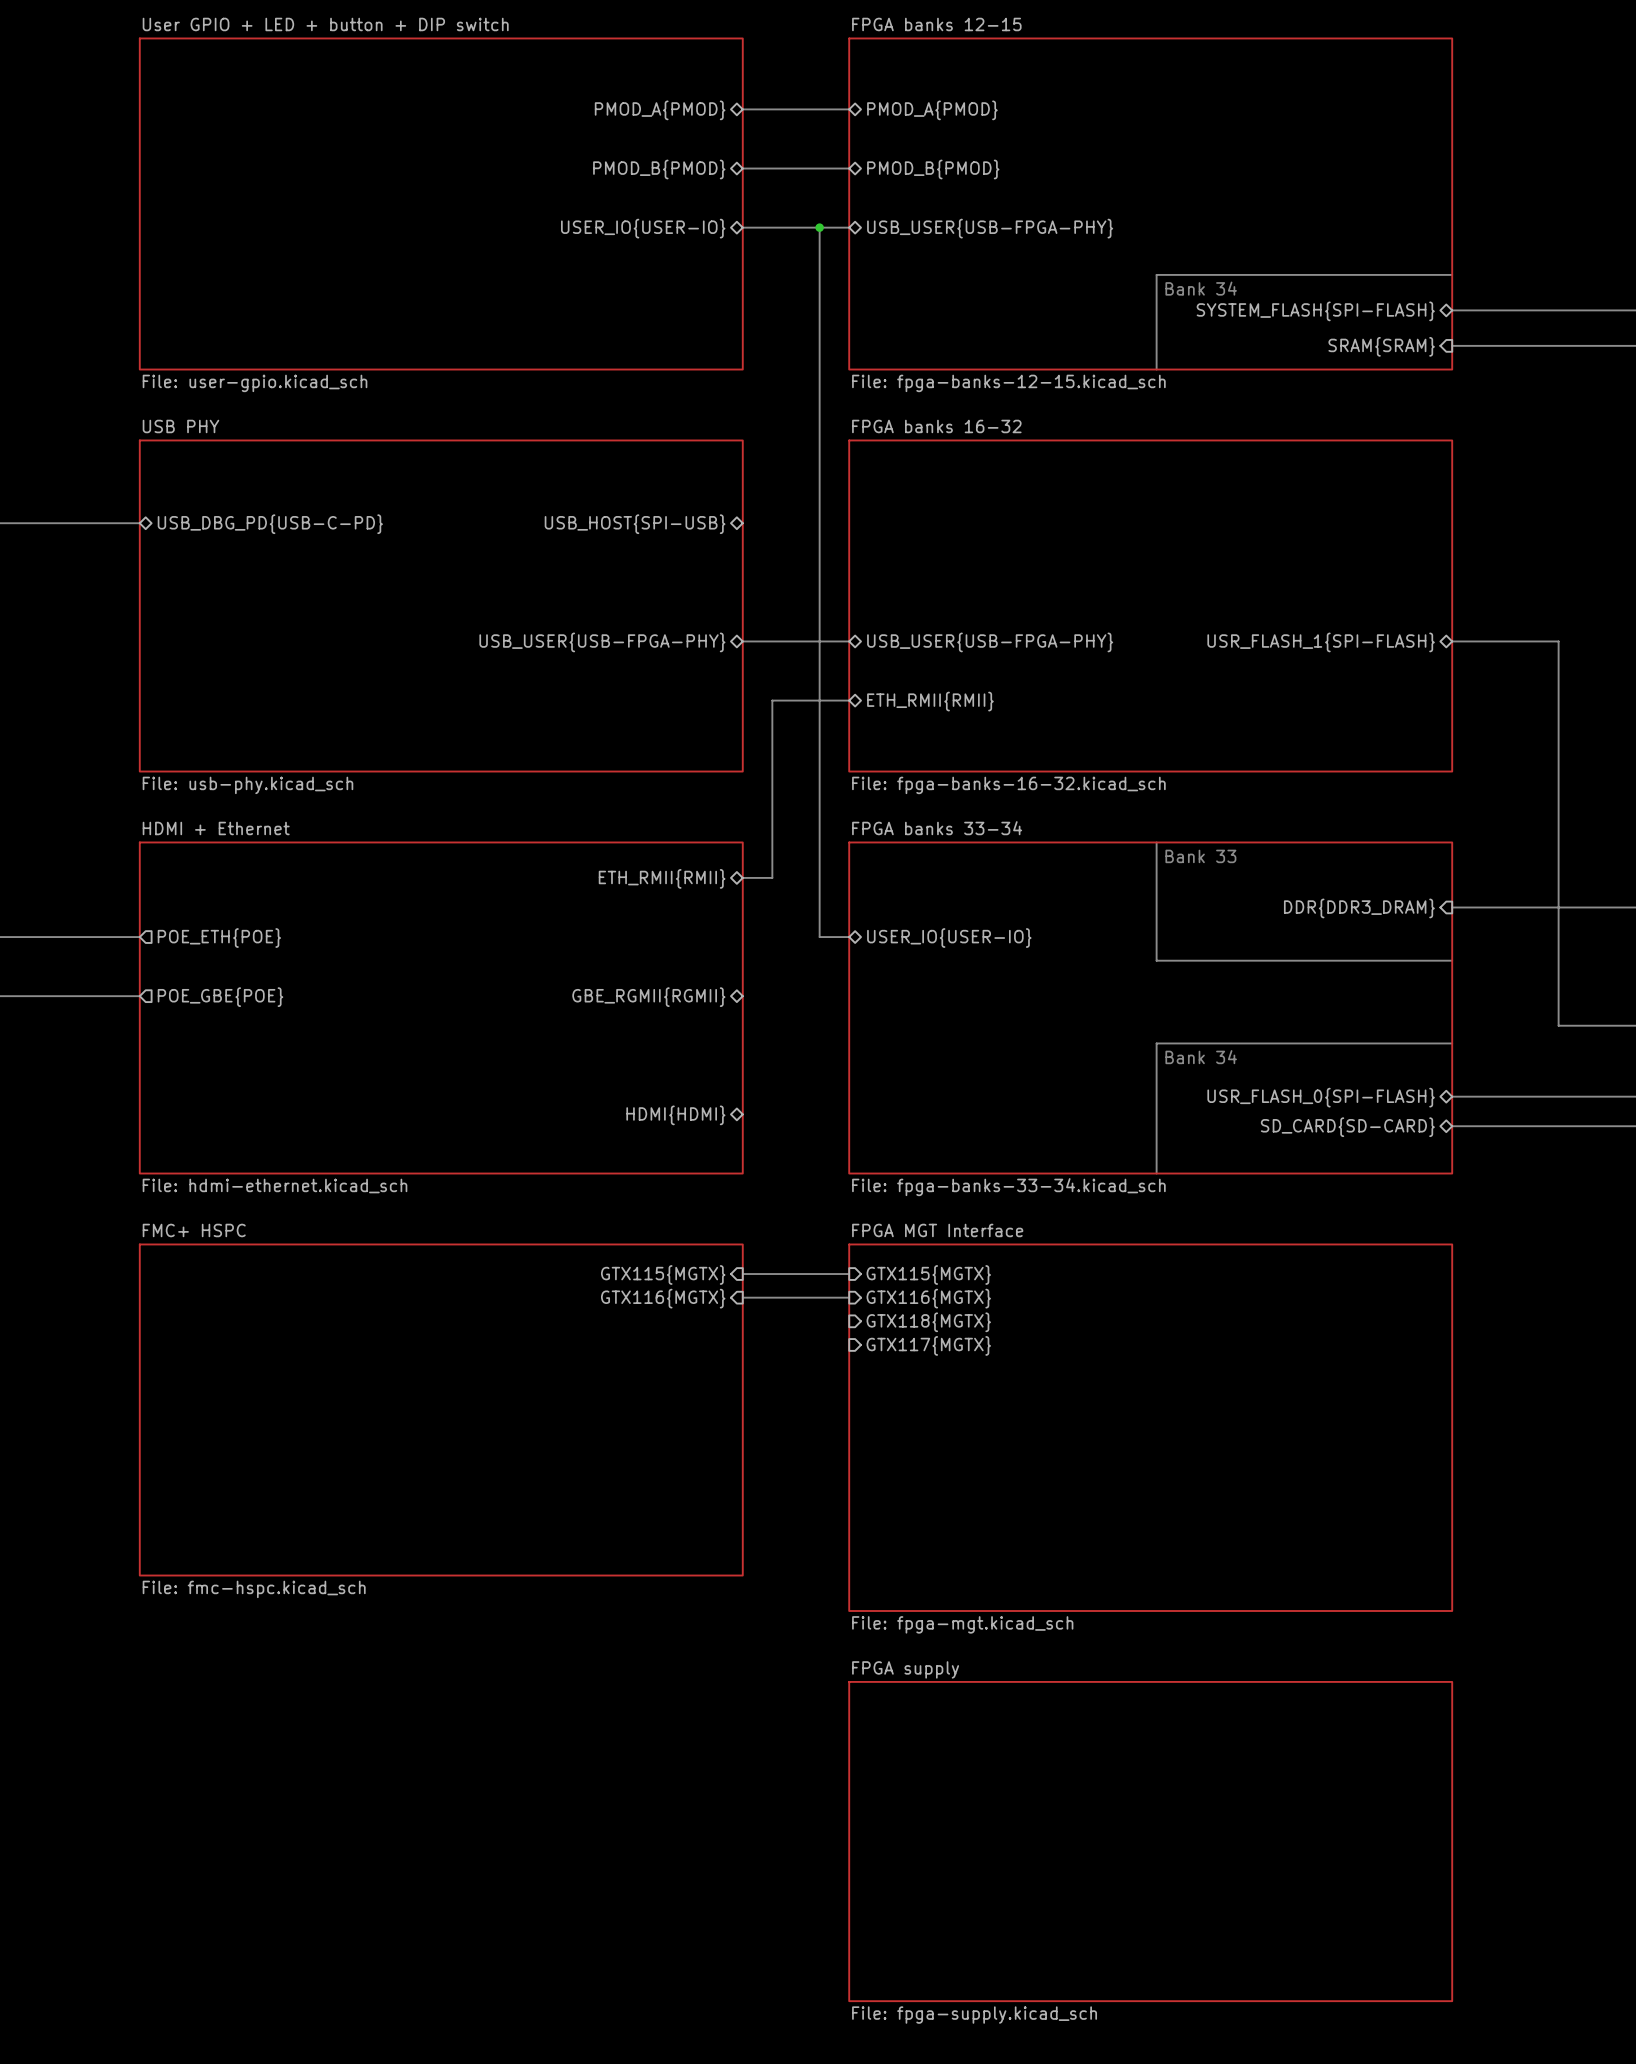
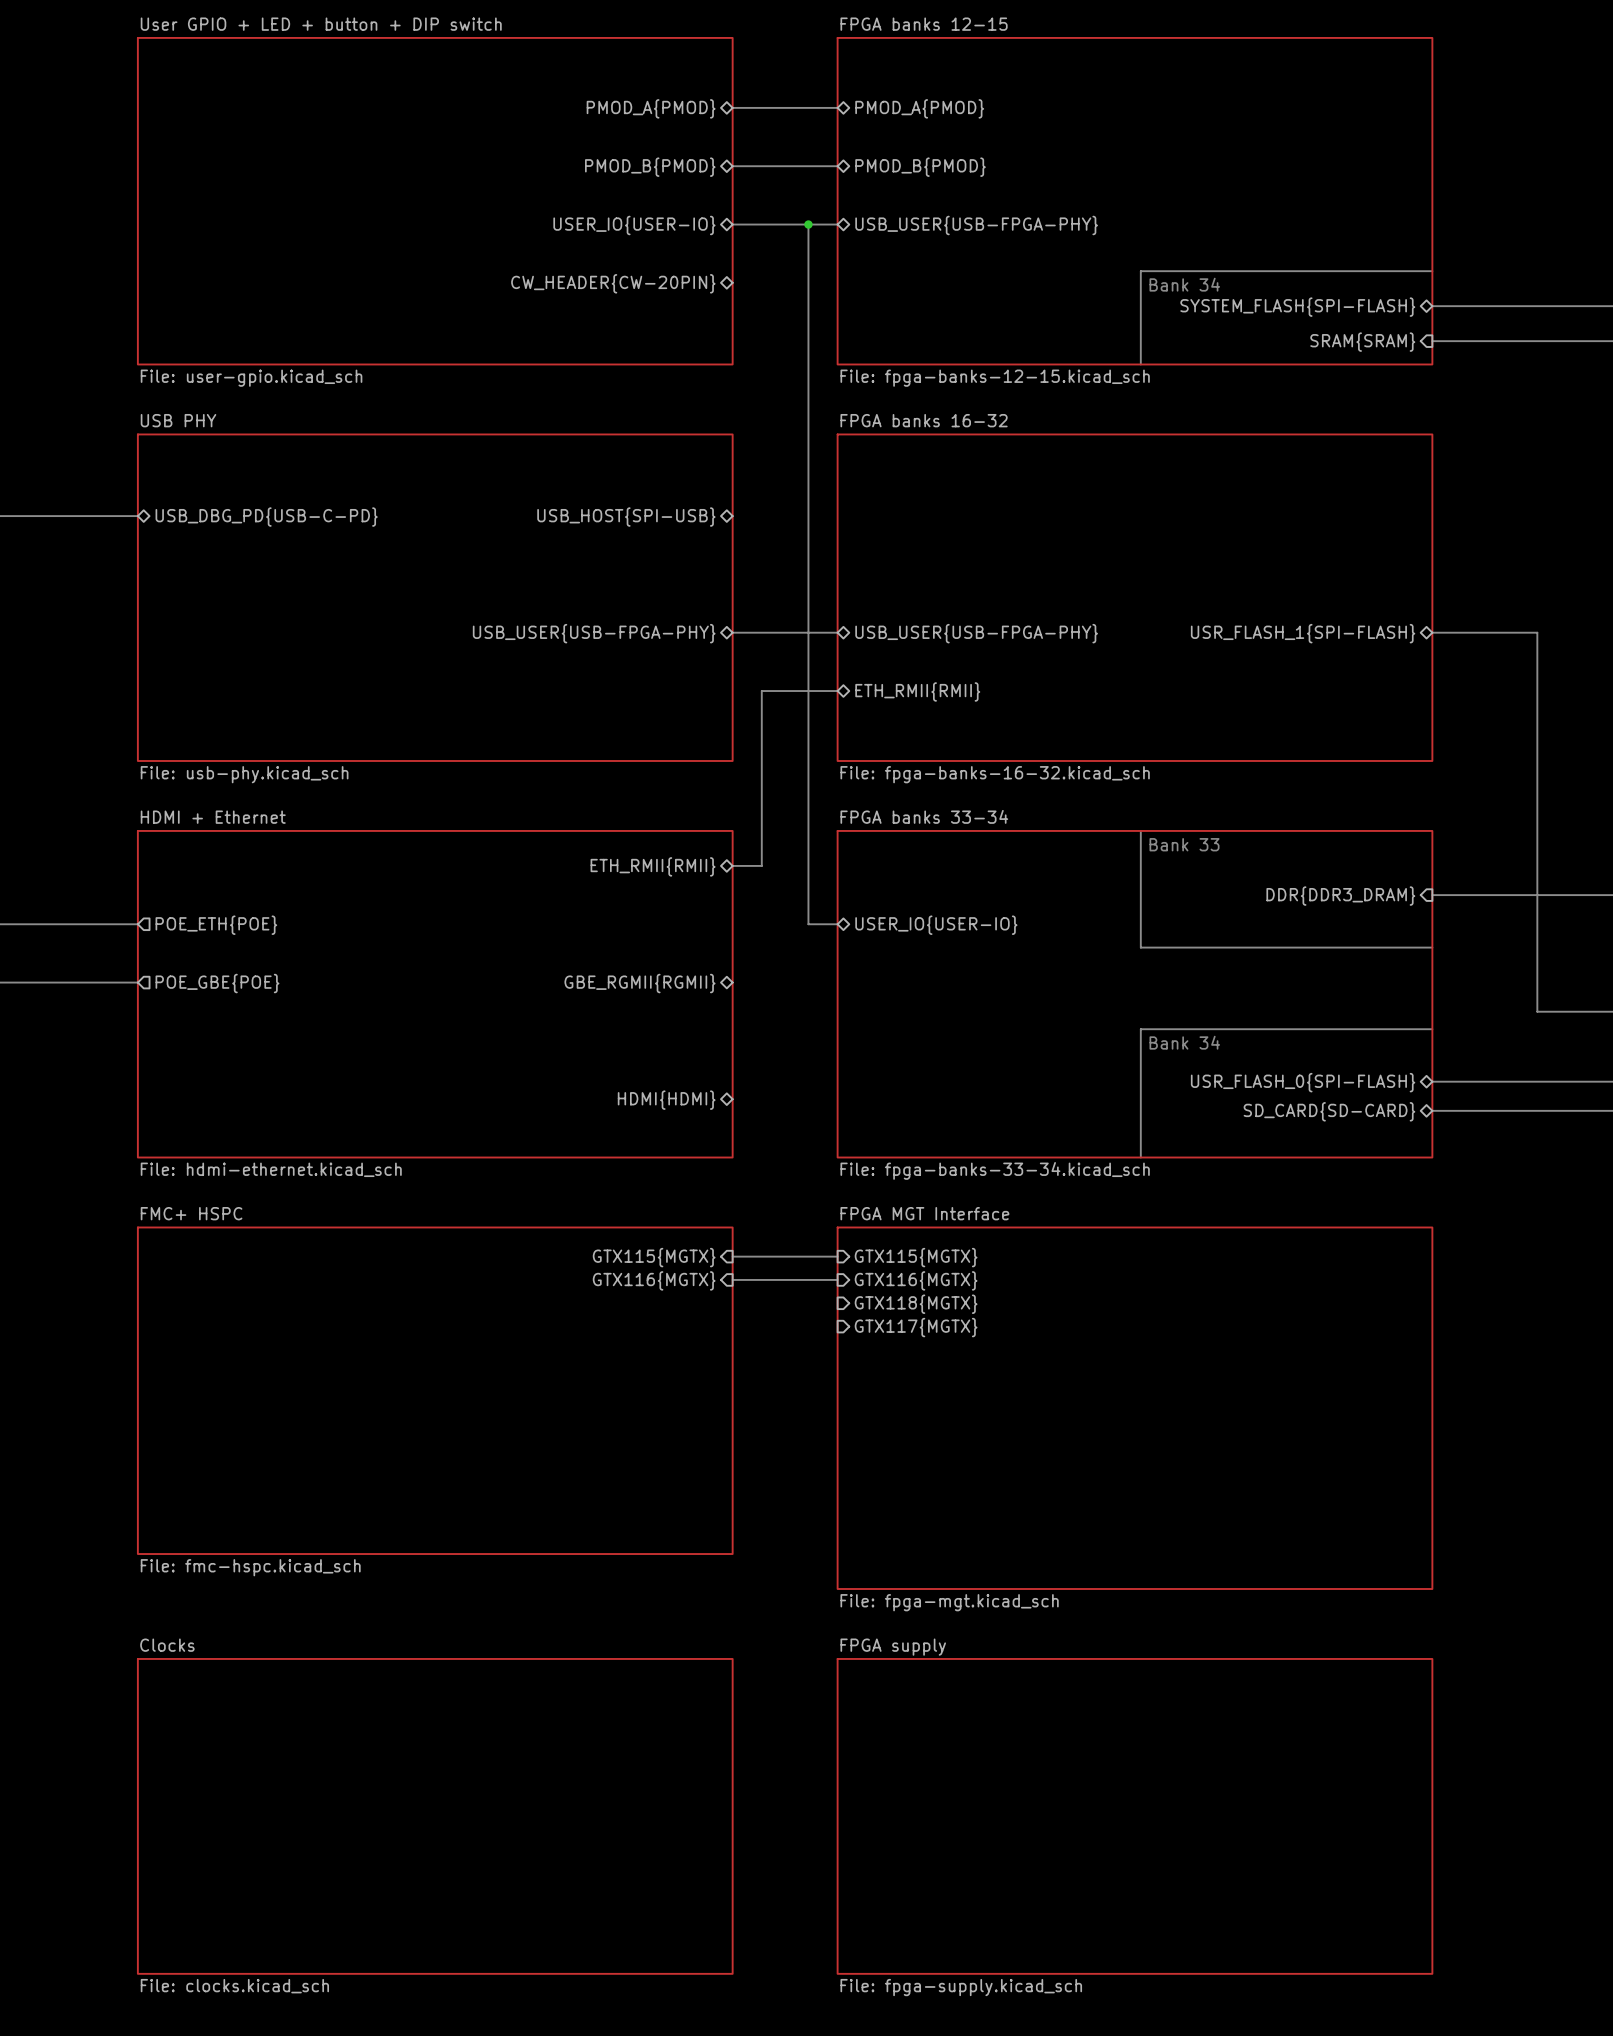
sheet pin: none -> CW_HEADER{CW-20PIN} (613, 283)
sheet Clocks: none -> File: clocks.kicad_sch (435, 1816)

